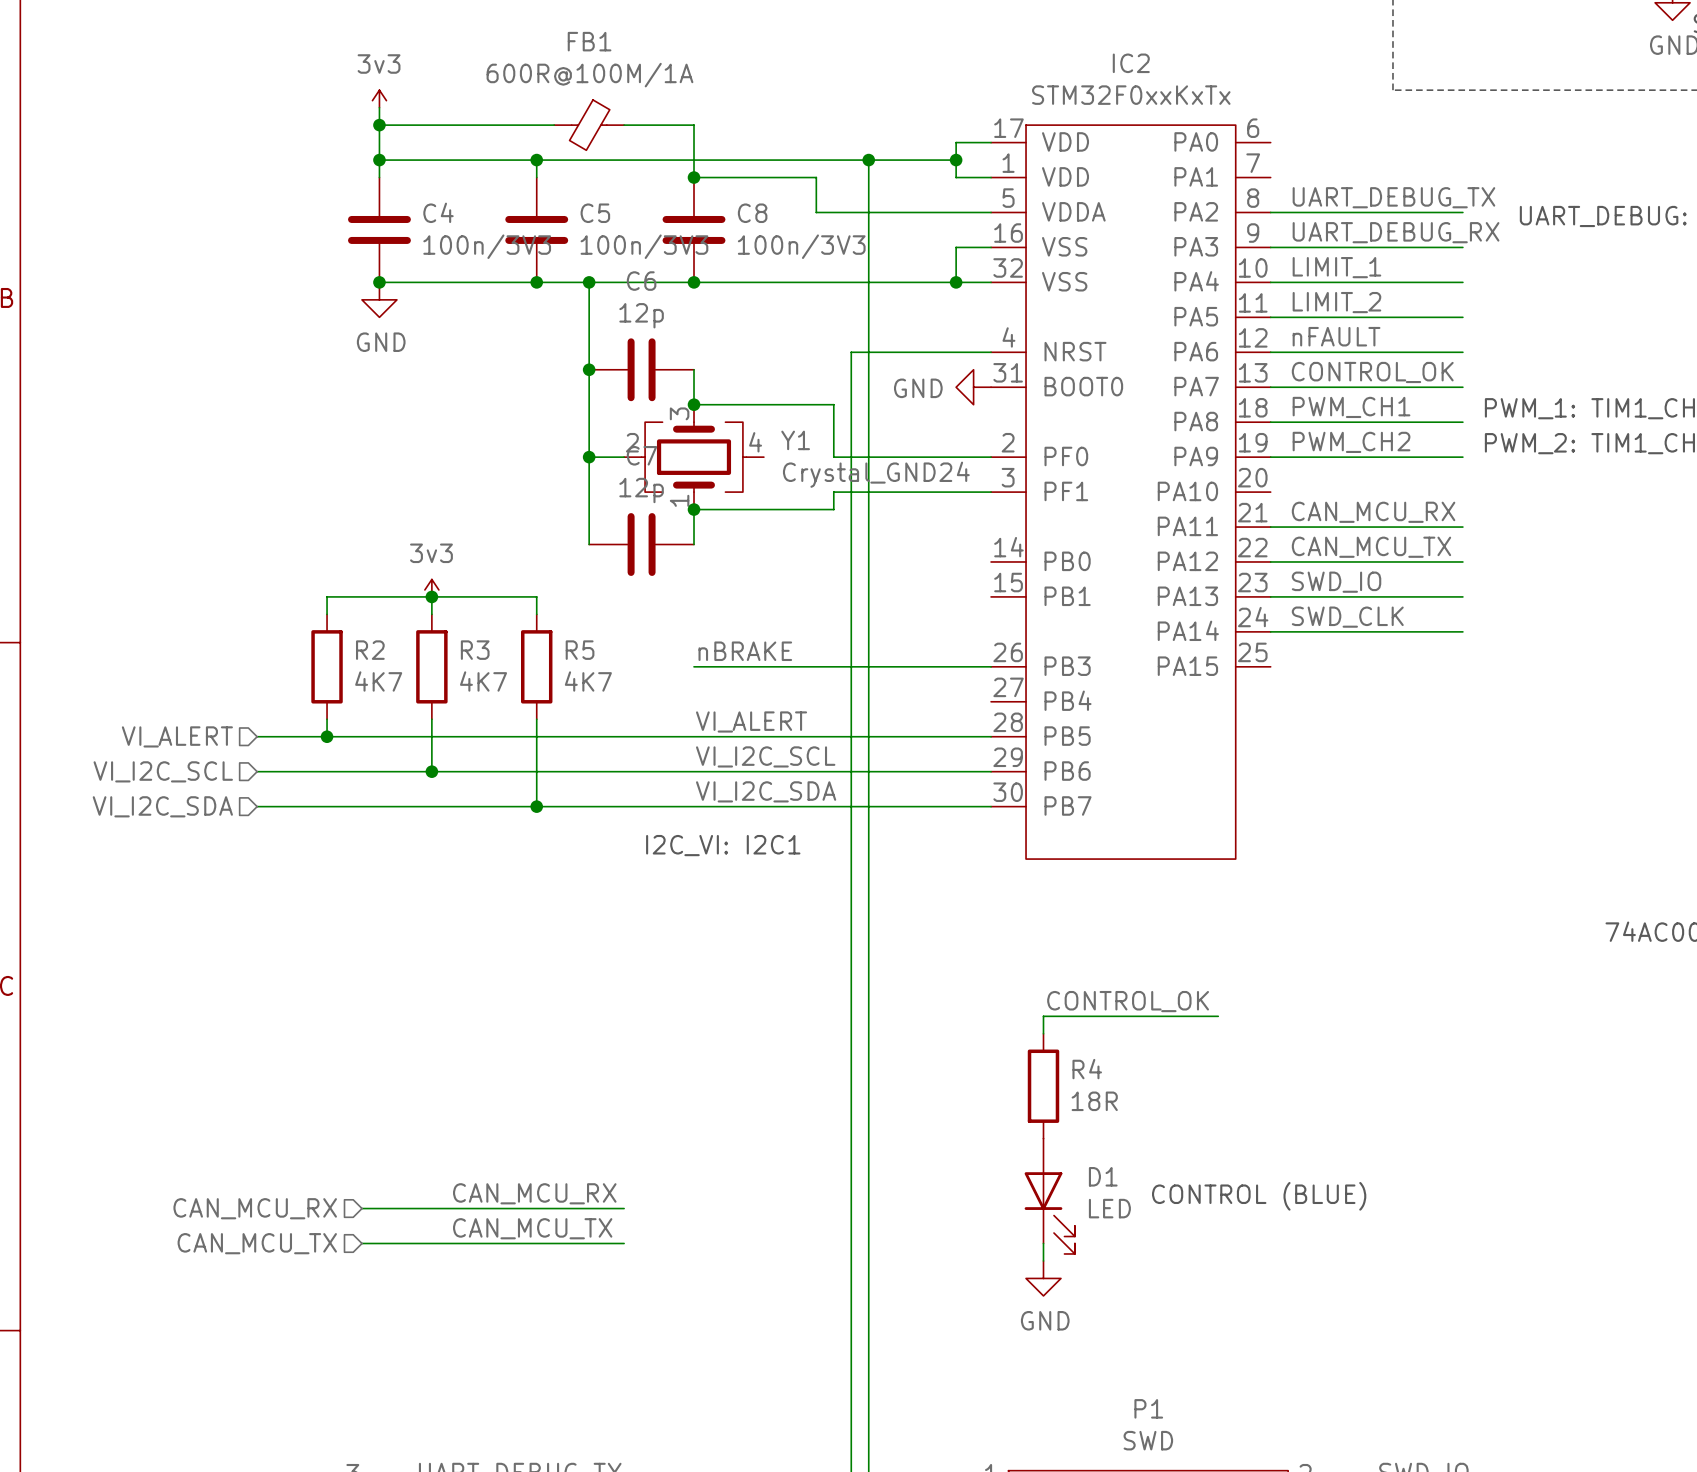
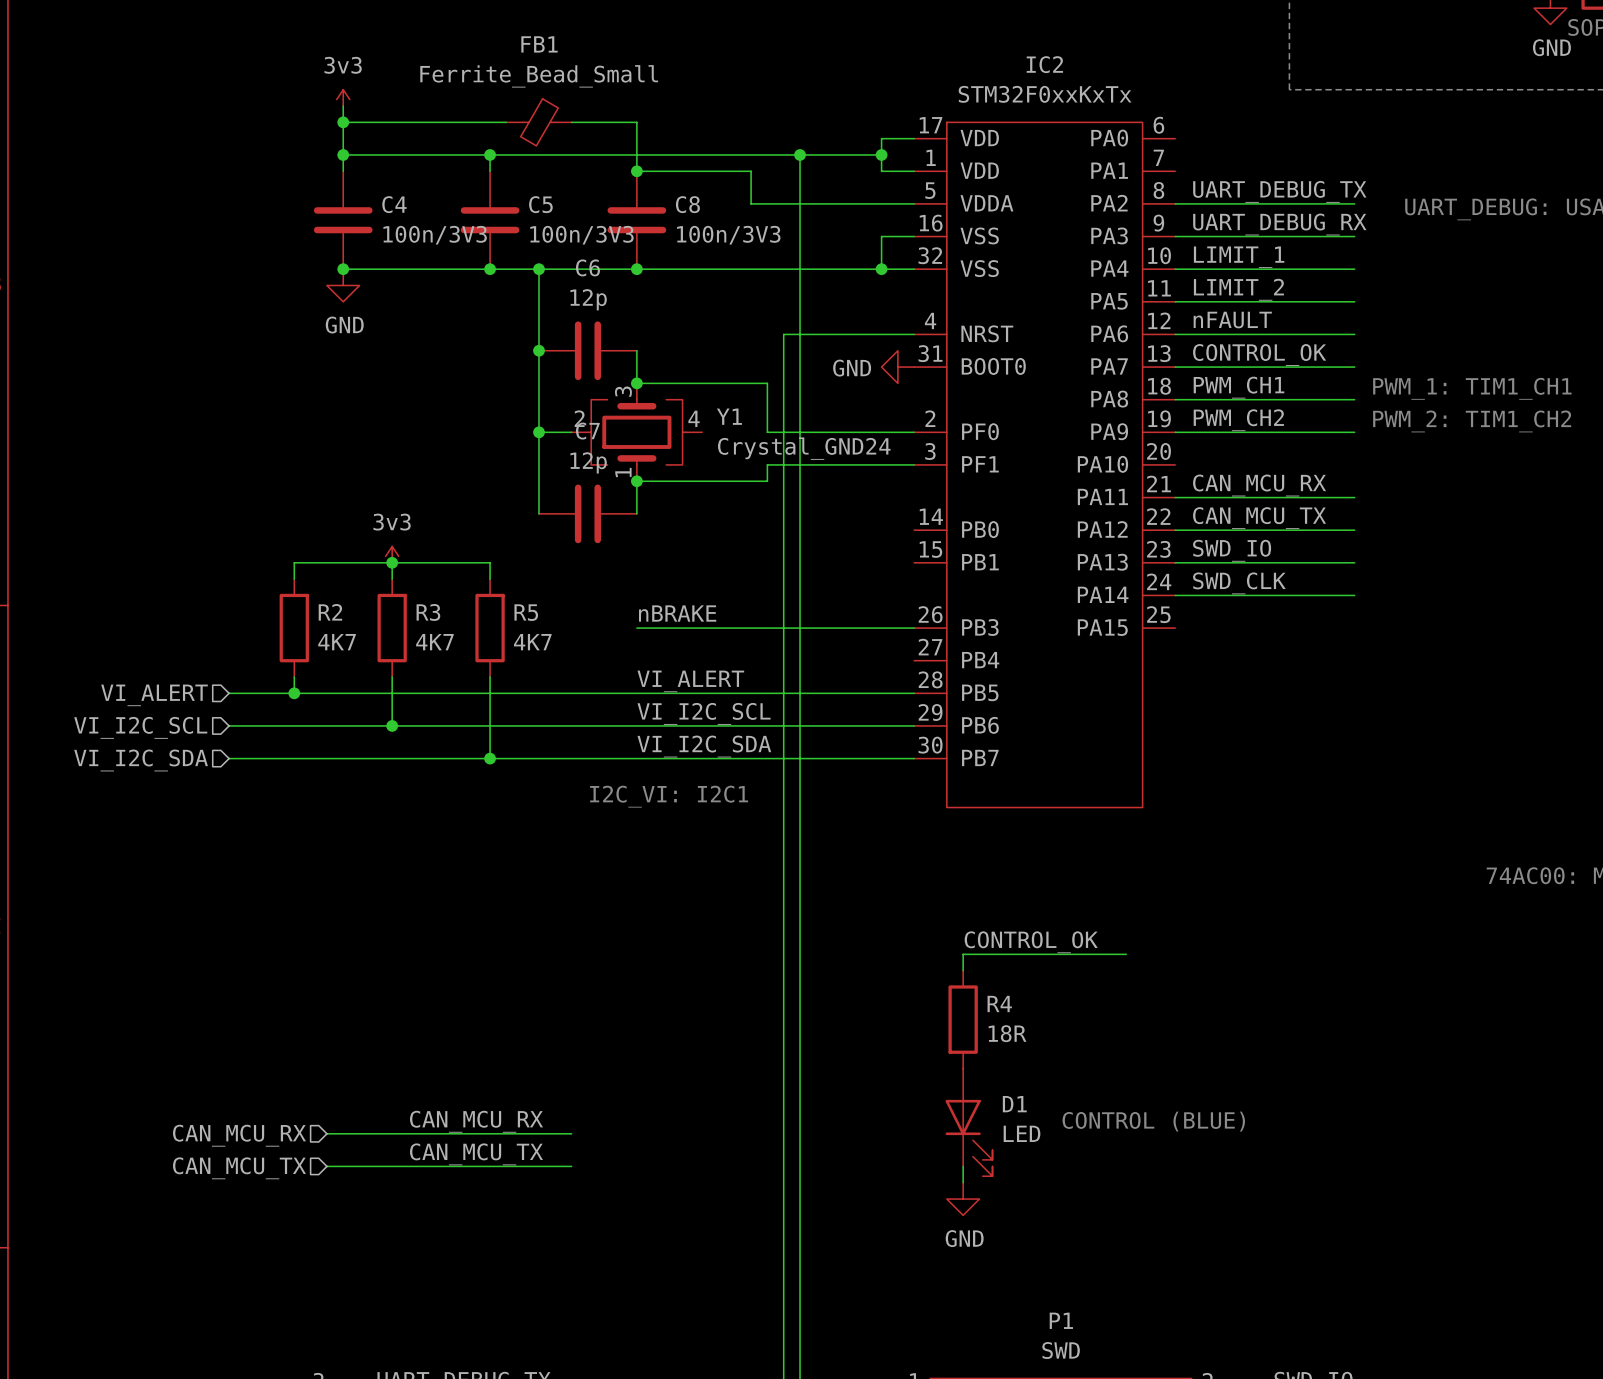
FB1 value: 600R@100M/1A (589, 75) -> Ferrite_Bead_Small (539, 76)

